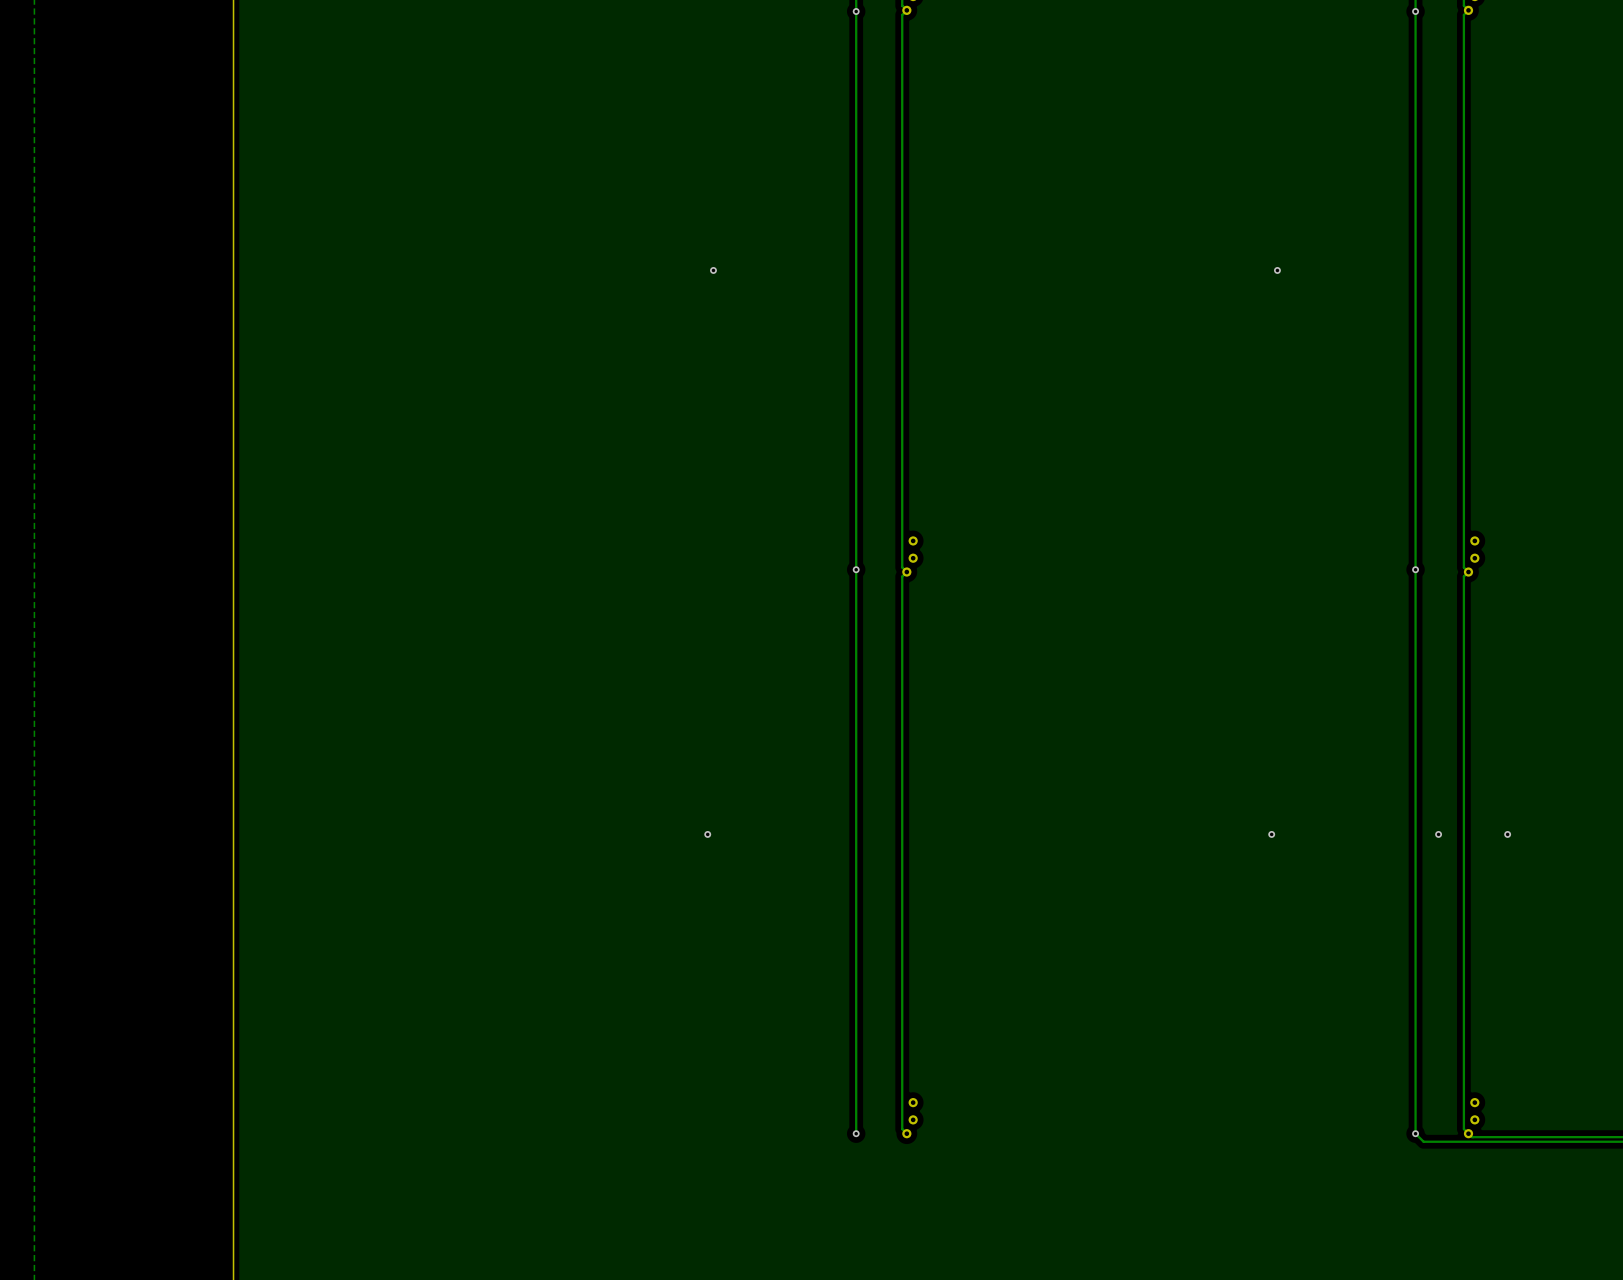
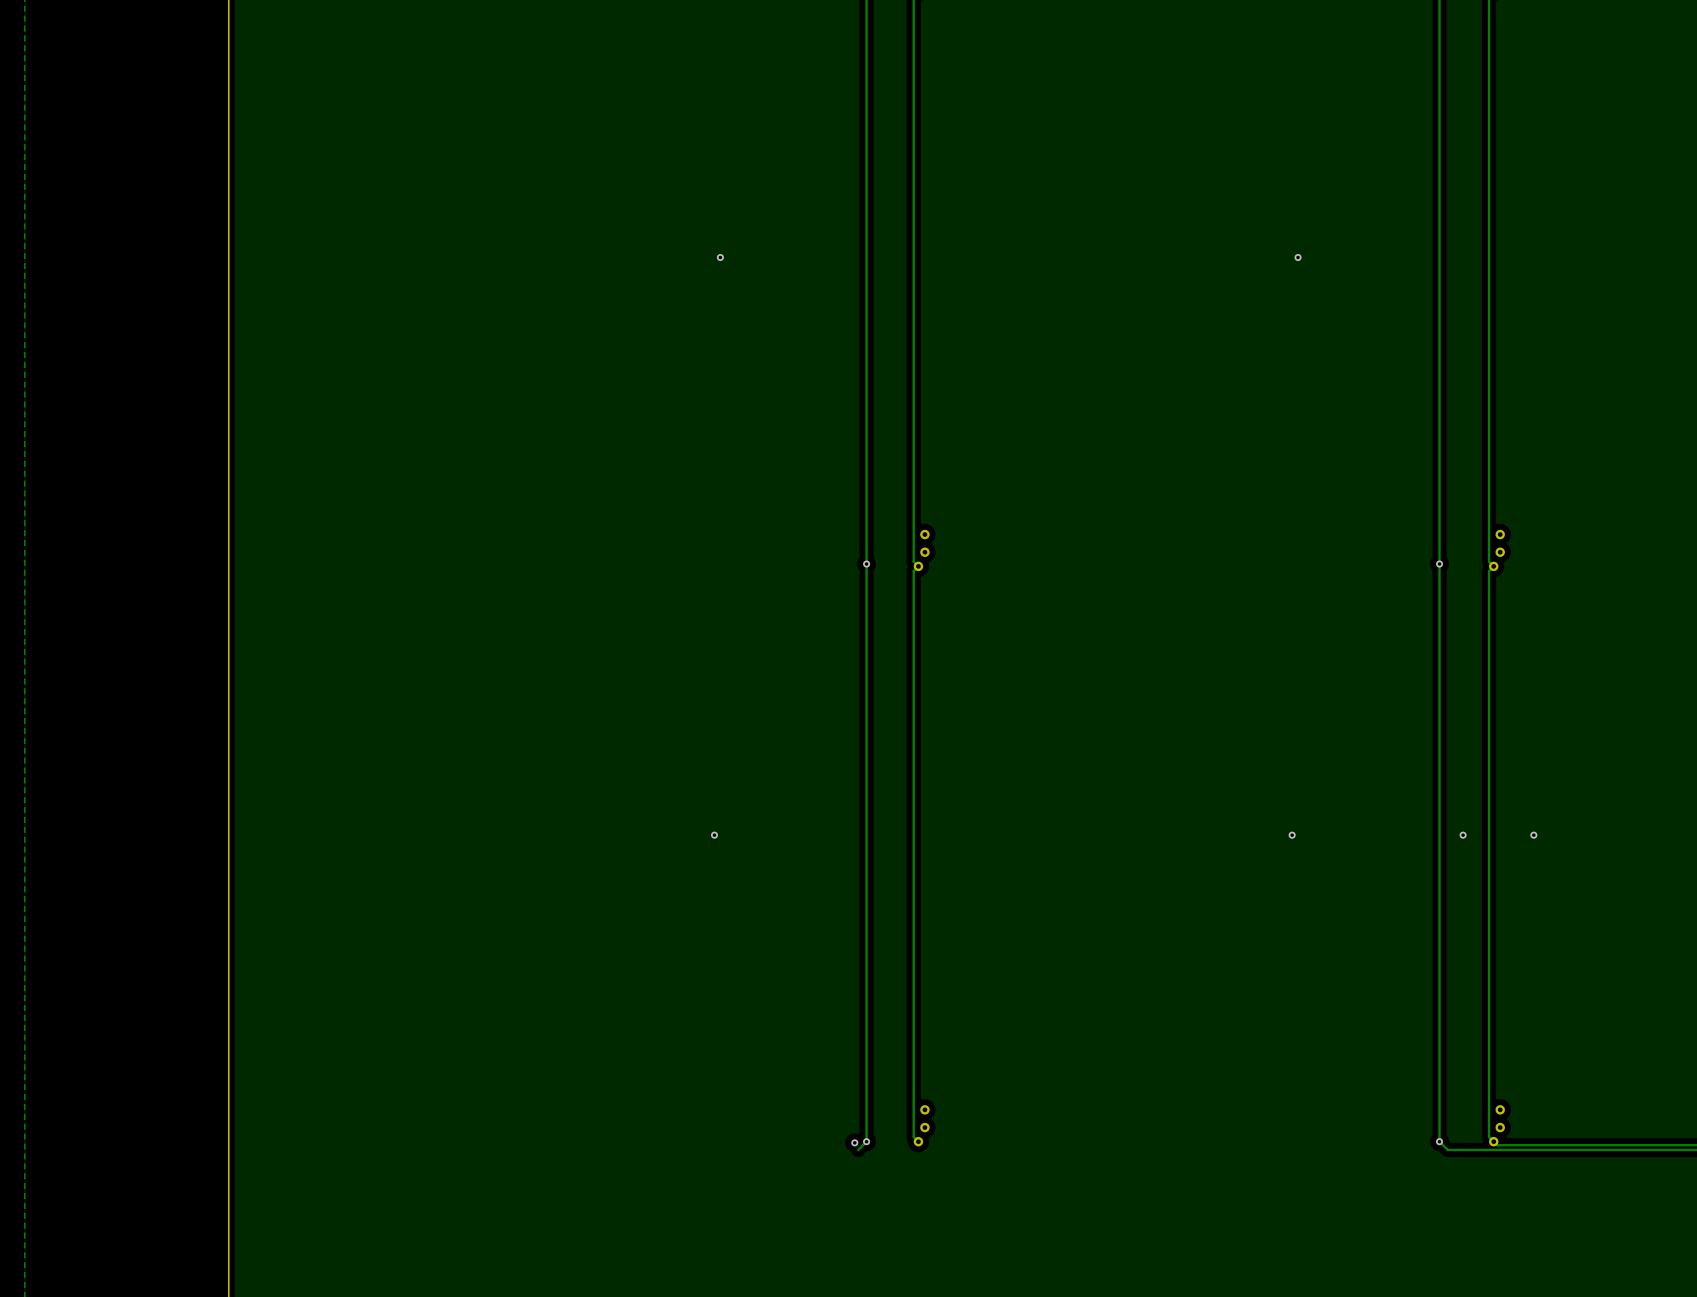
track: none -> (866, 1141) (858, 1149)
via: none -> (854, 1142)

